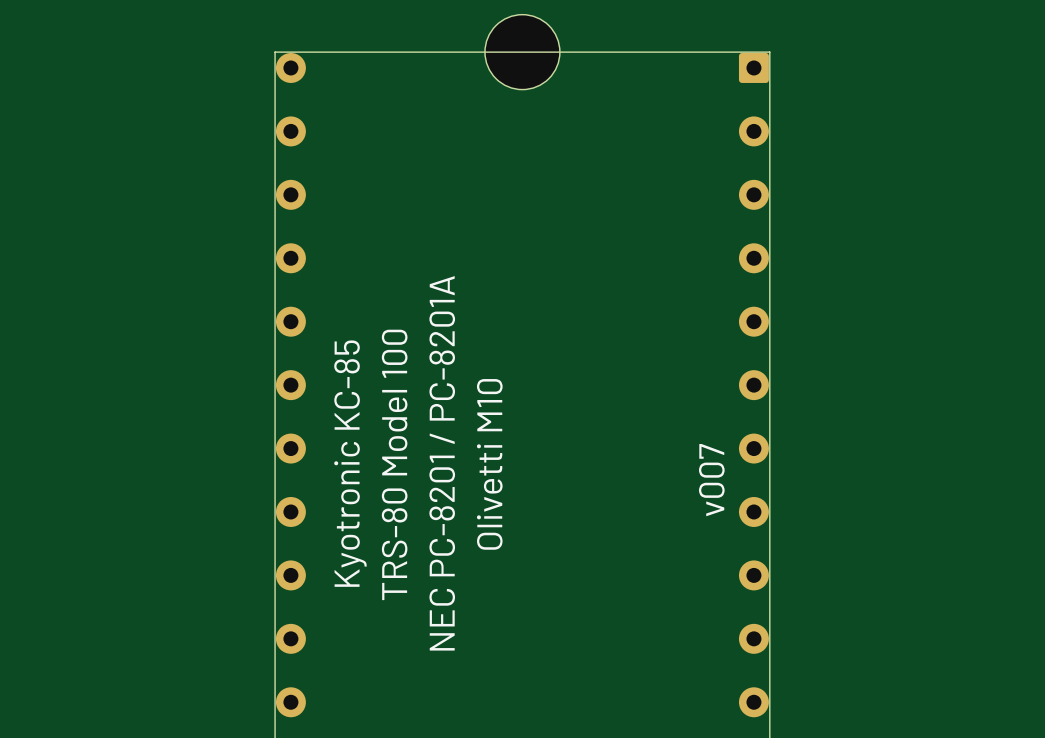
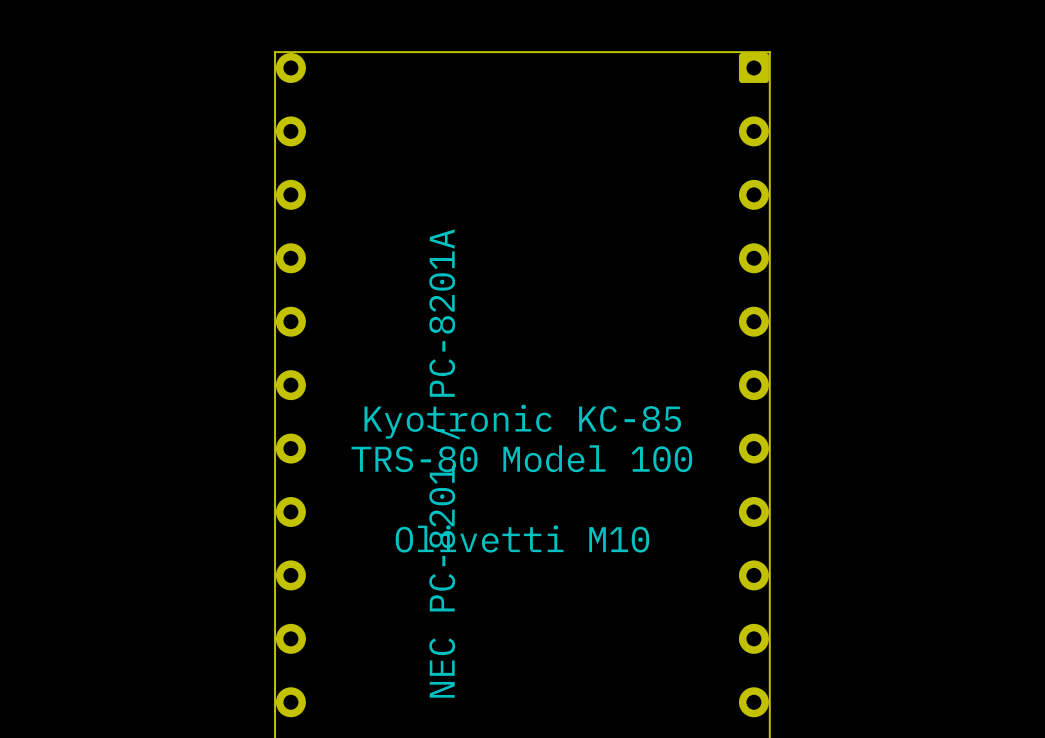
part: (522, 52) -> none
text rotation: 0° (350, 463) -> 90° clockwise (522, 421)
text rotation: 0° (394, 464) -> 90° clockwise (521, 458)
text rotation: 0° (489, 464) -> 90° clockwise (522, 538)
text: v007 (711, 480) -> none

